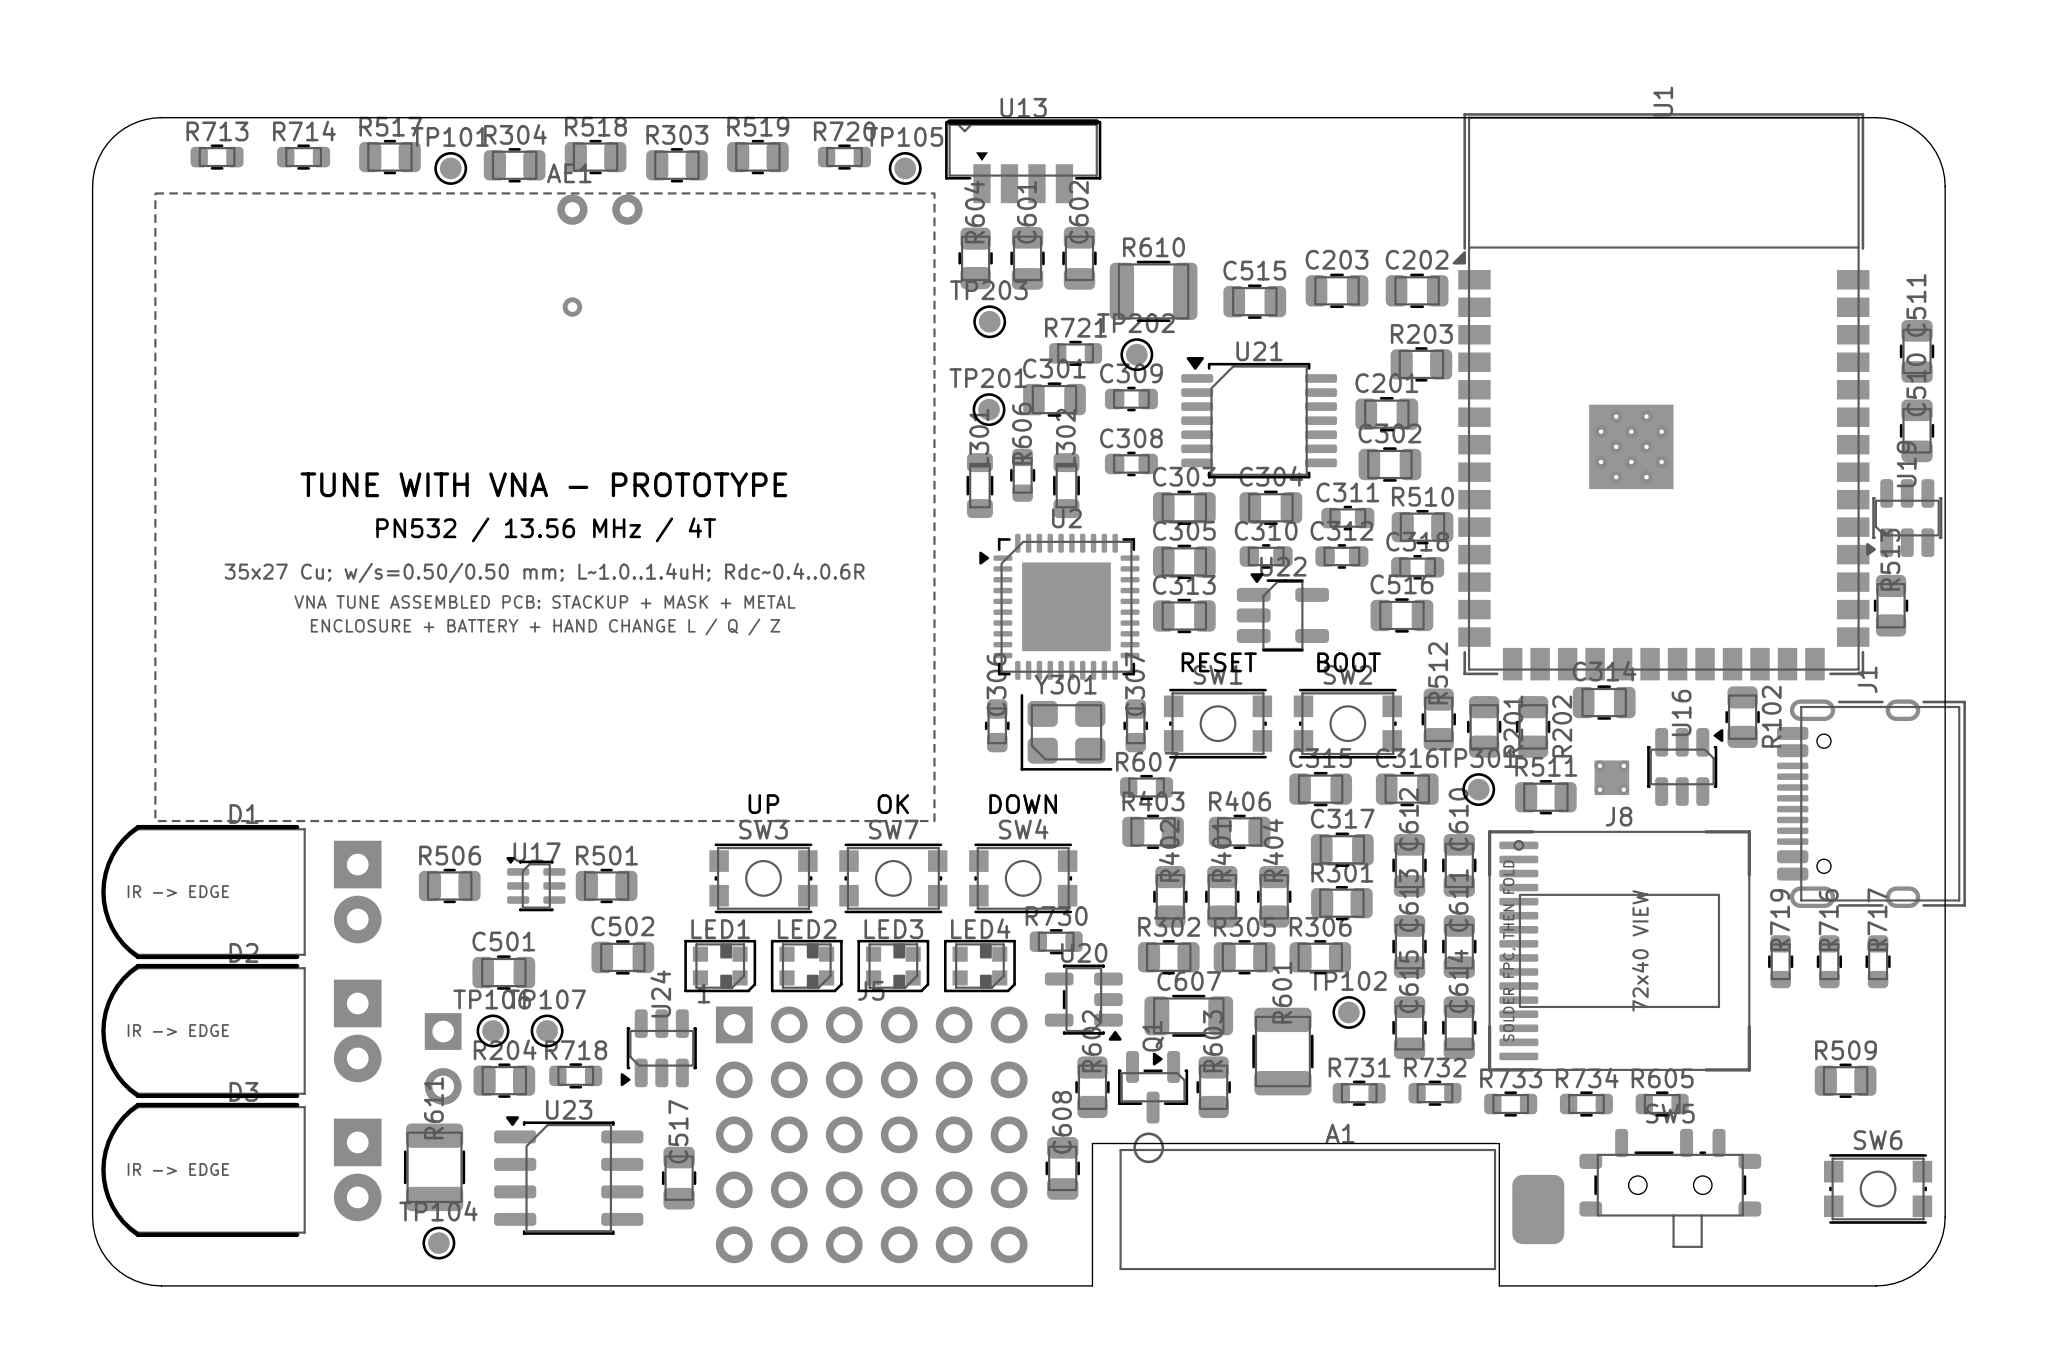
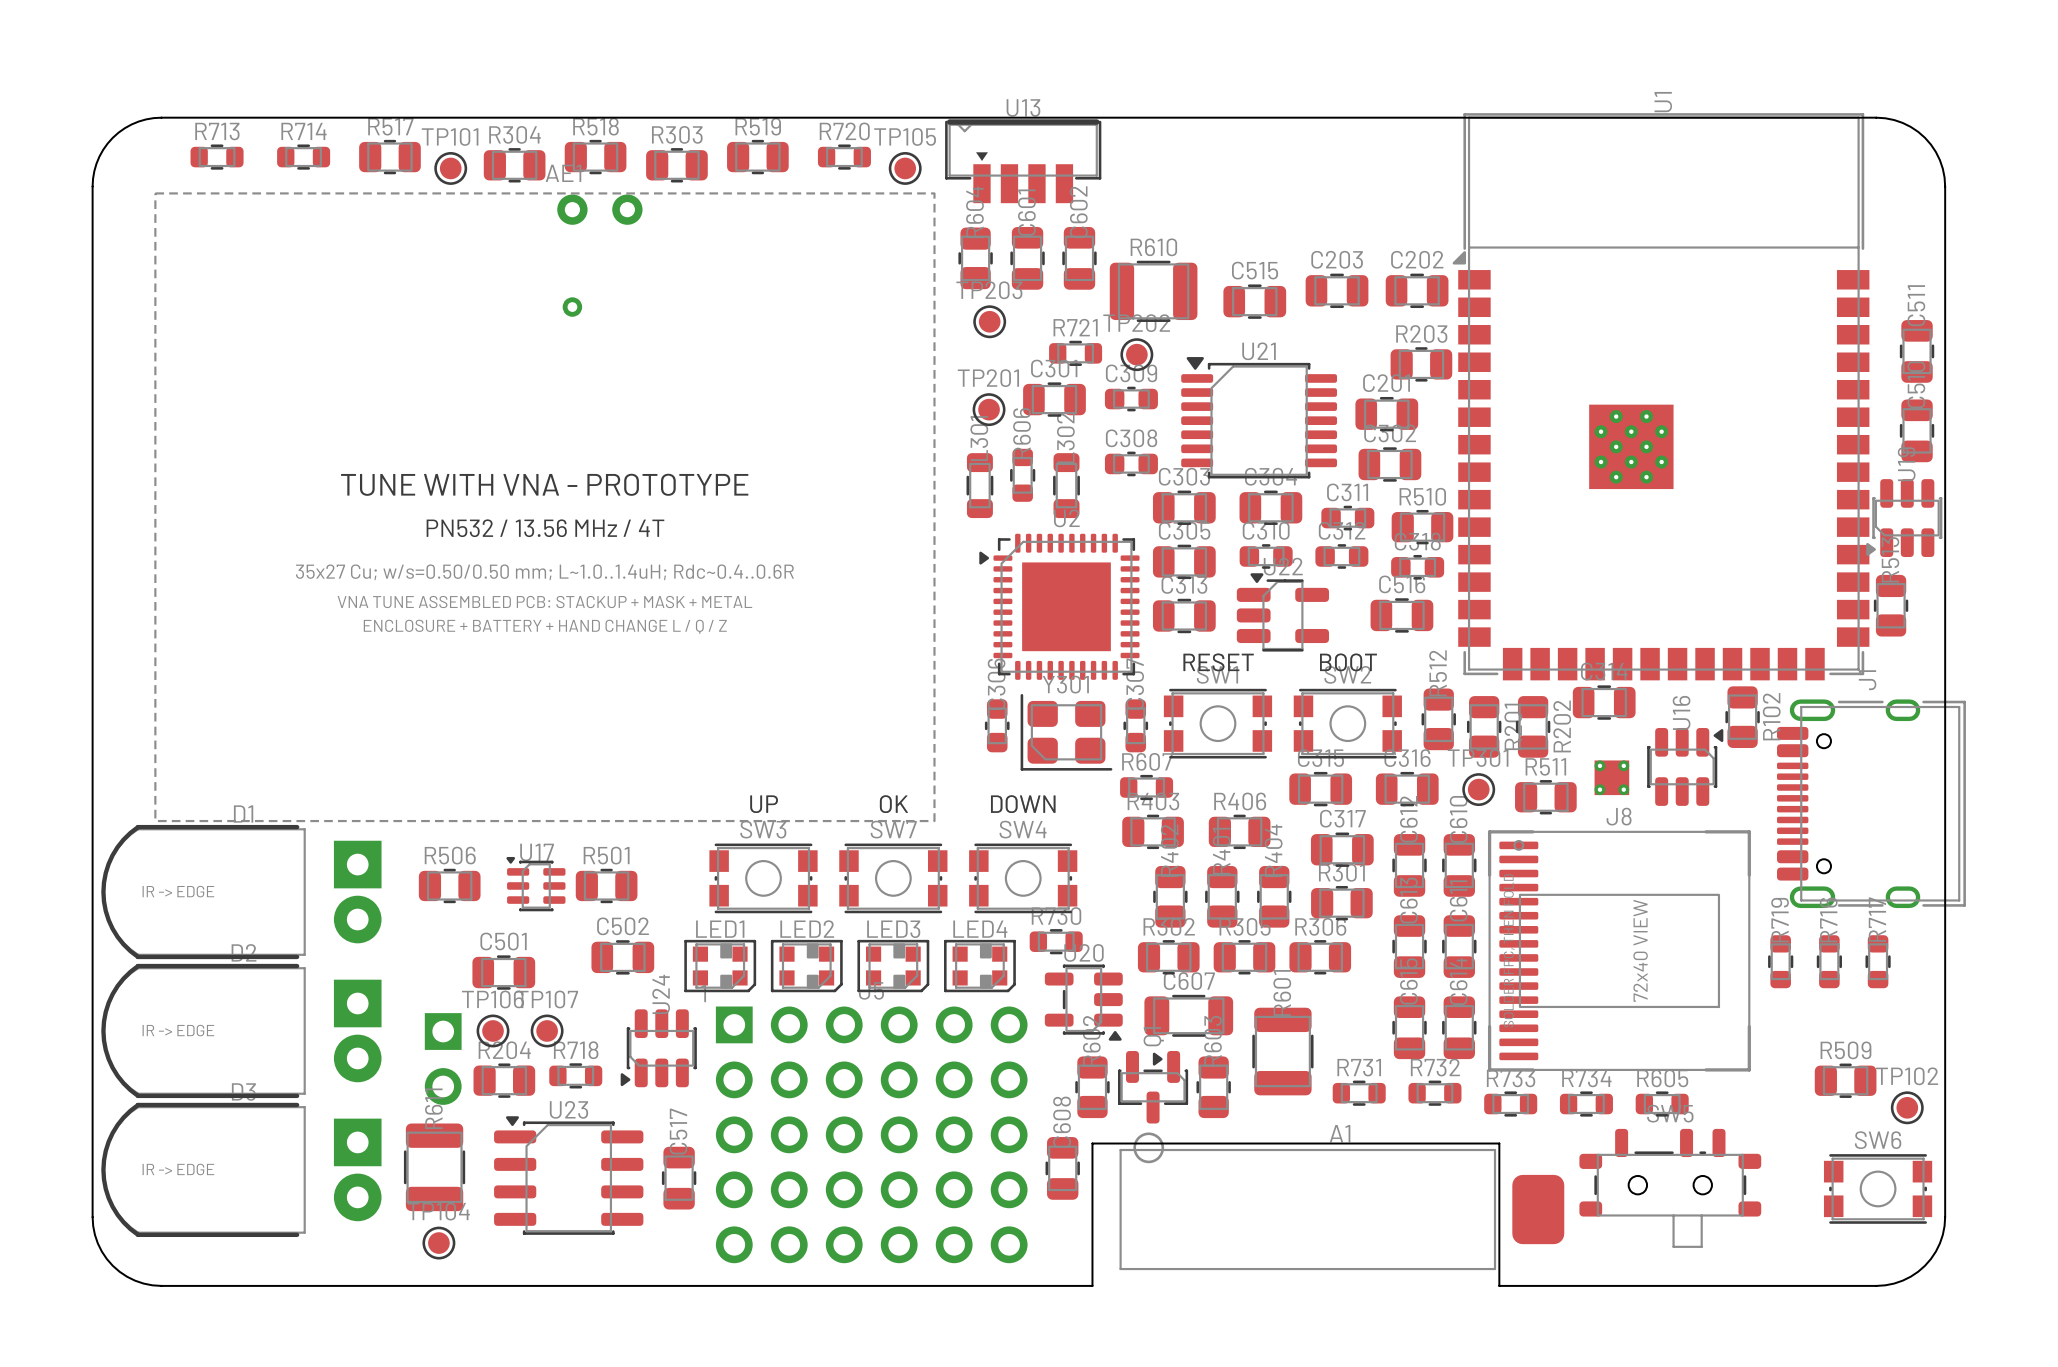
TP102 position: (1348, 1012) -> (1907, 1107)

